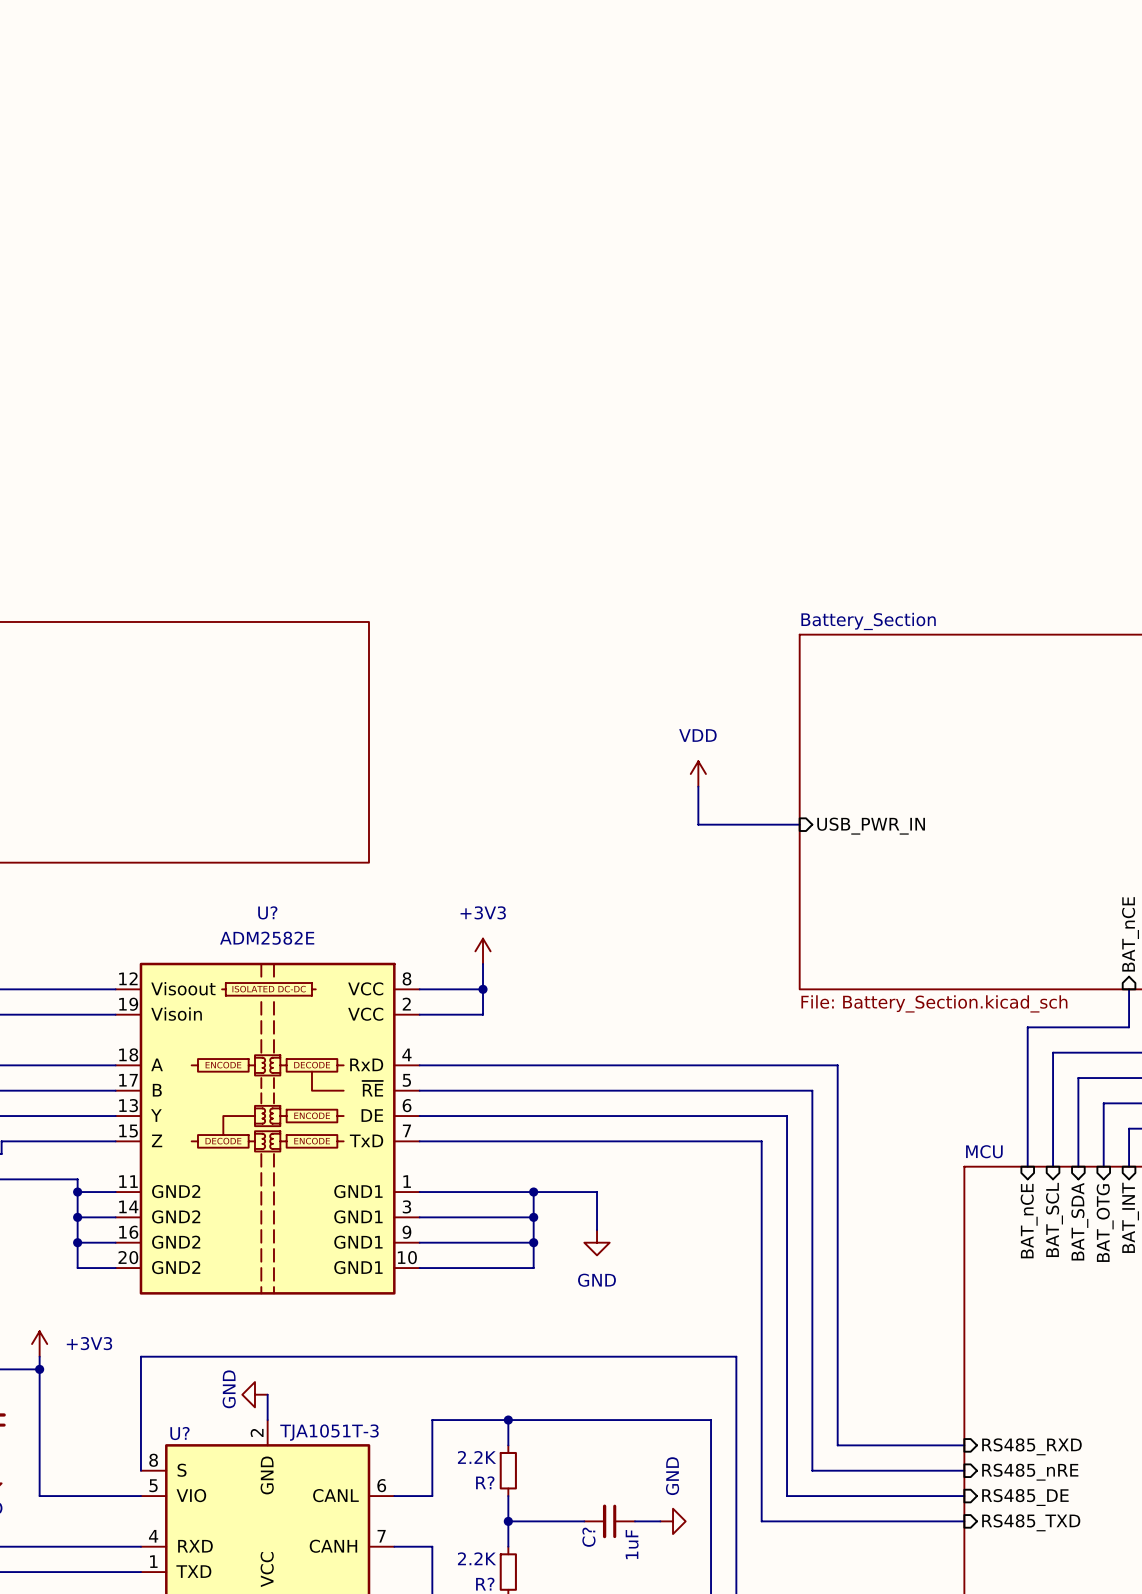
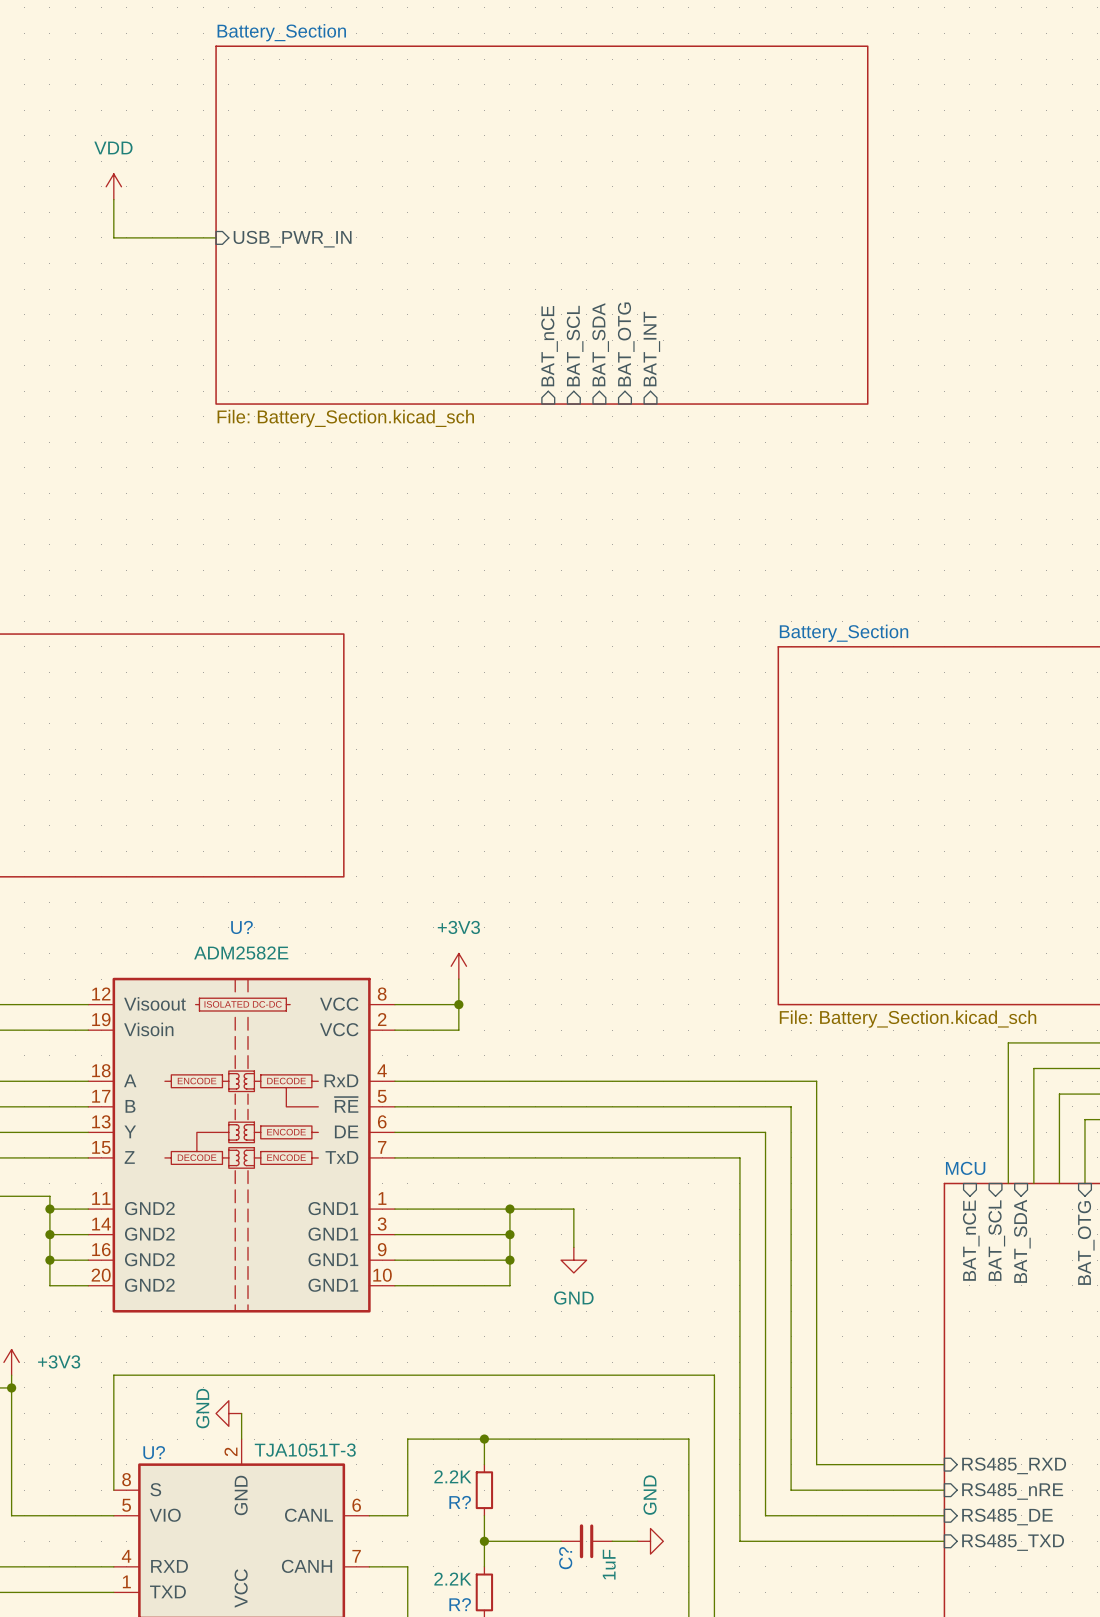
power symbol: none -> VDD (113, 186)
wire: none -> (113, 199) (113, 237) (216, 237)
sheet Battery_Section: none -> File: Battery_Section.kicad_sch (541, 225)
sheet pin: none -> USB_PWR_IN (292, 239)
sheet pin: none -> BAT_SDA (600, 344)
sheet pin: none -> BAT_OTG (626, 344)
sheet pin: none -> BAT_nCE (549, 346)
sheet pin: none -> BAT_SCL (575, 346)
sheet pin: none -> BAT_INT (651, 349)
power symbol: VDD (698, 774) -> none
wire: (698, 786) (698, 824) (799, 824) -> none
sheet pin: USB_PWR_IN (871, 826) -> none
sheet pin position: BAT_SCL (1054, 1219) -> BAT_SCL (996, 1240)
sheet pin position: BAT_nCE (1029, 1221) -> BAT_nCE (971, 1240)
sheet pin position: BAT_SDA (1079, 1221) -> BAT_SDA (1022, 1241)

